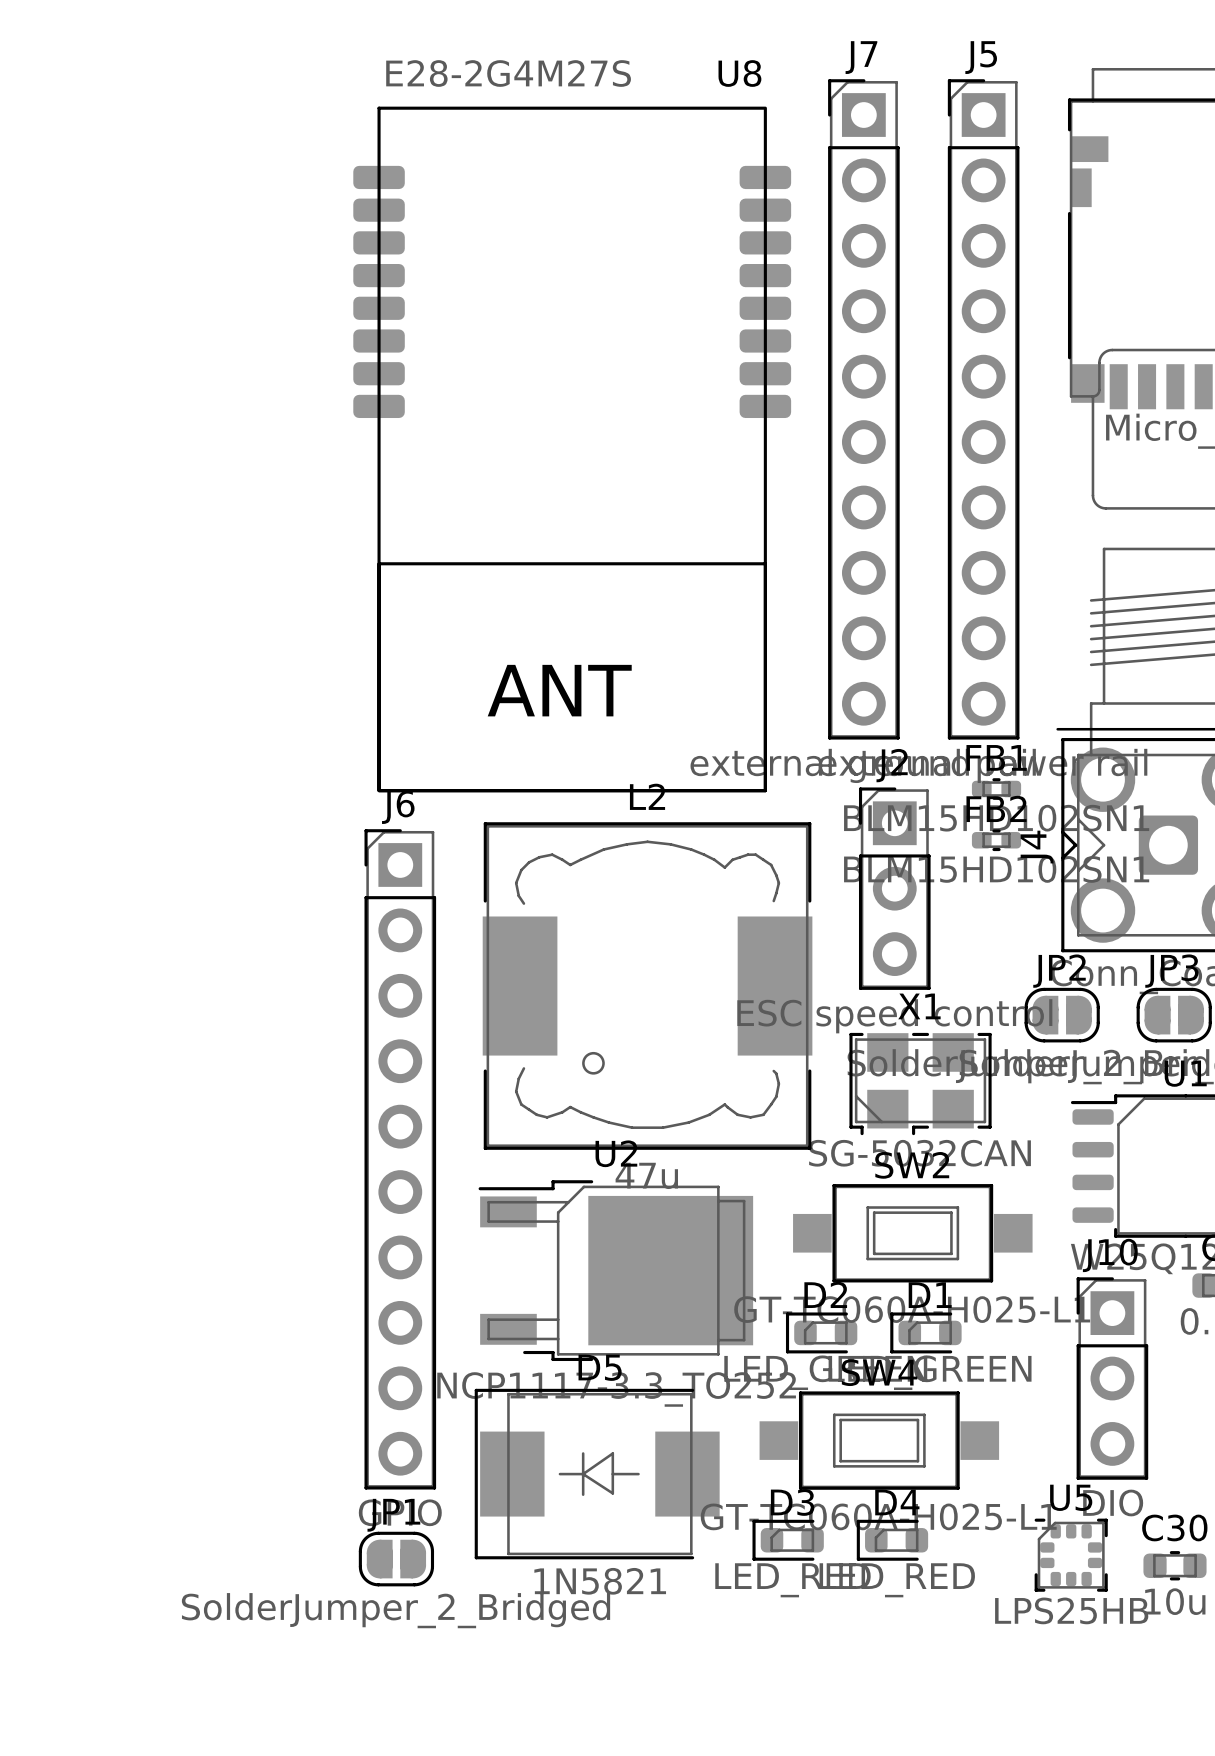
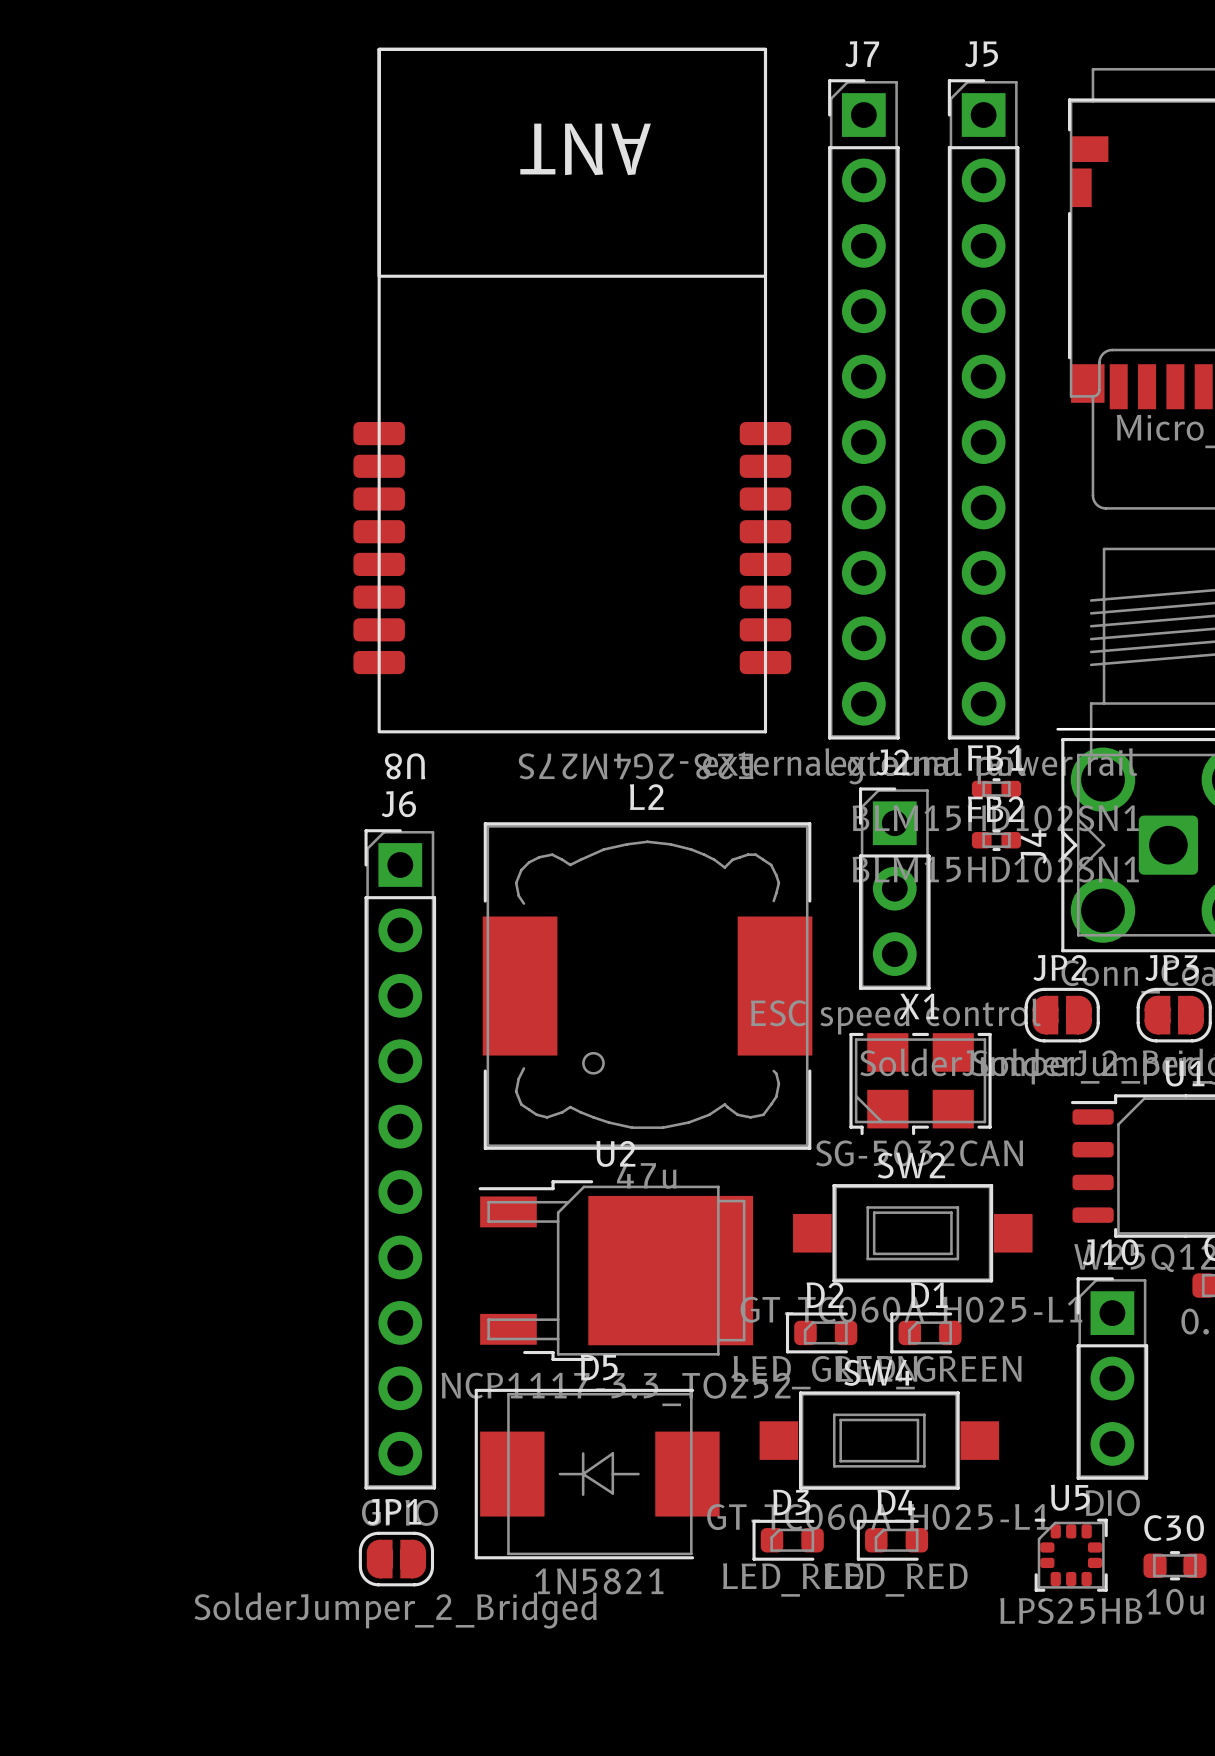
U8 rotation: 0° (572, 449) -> 180° (572, 390)

